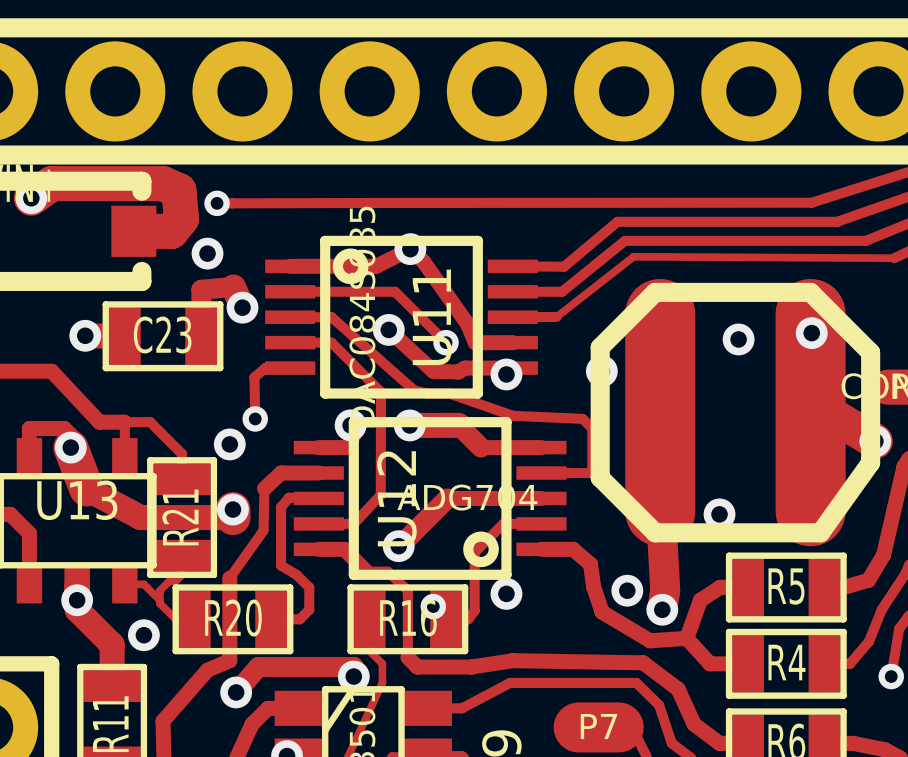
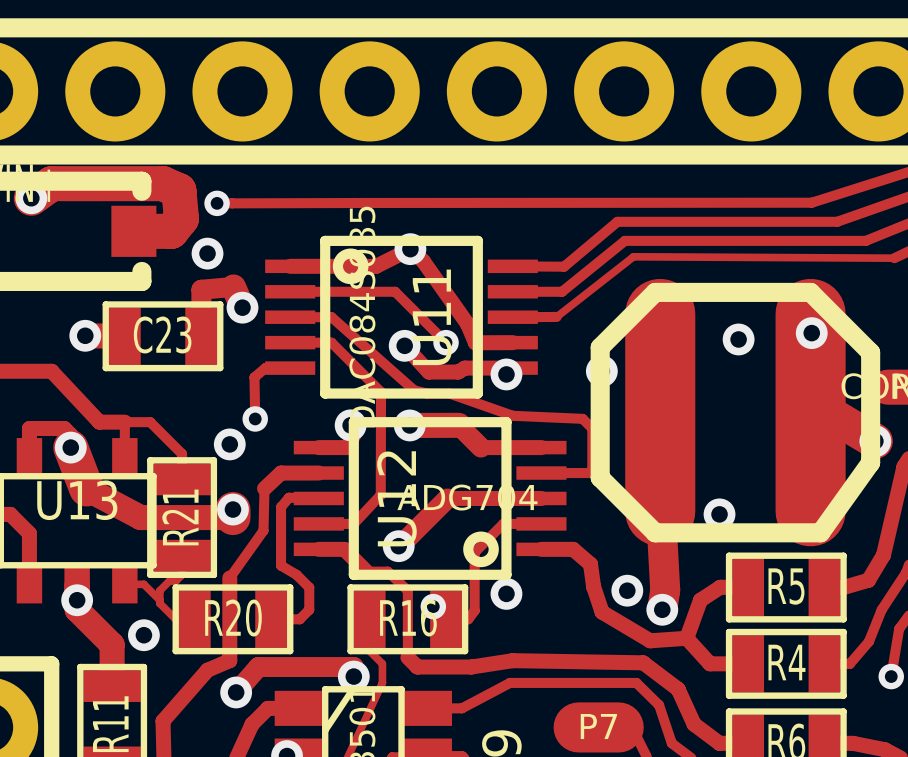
track: (388, 329) (433, 371) (458, 372) -> (404, 345) (428, 372) (458, 372)
via position: (388, 329) -> (404, 345)

